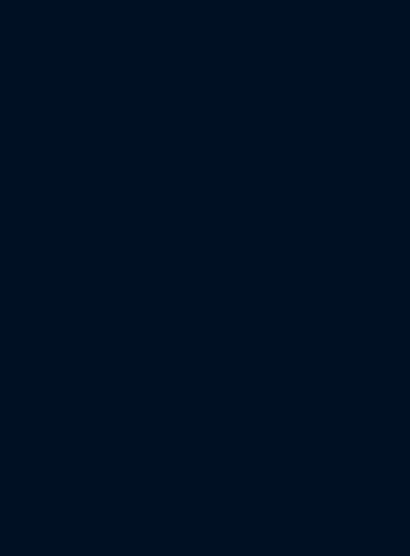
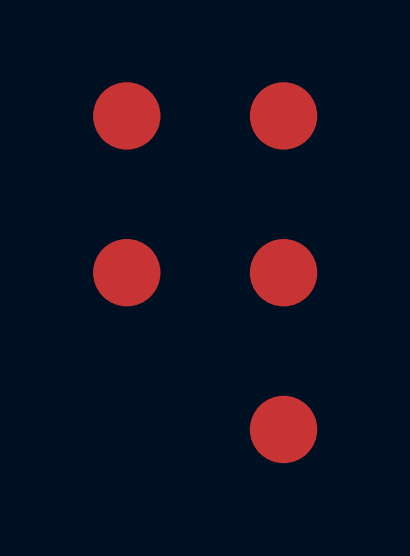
part: none -> (126, 115)
part: none -> (283, 115)
part: none -> (126, 272)
part: none -> (283, 272)
part: none -> (283, 429)

